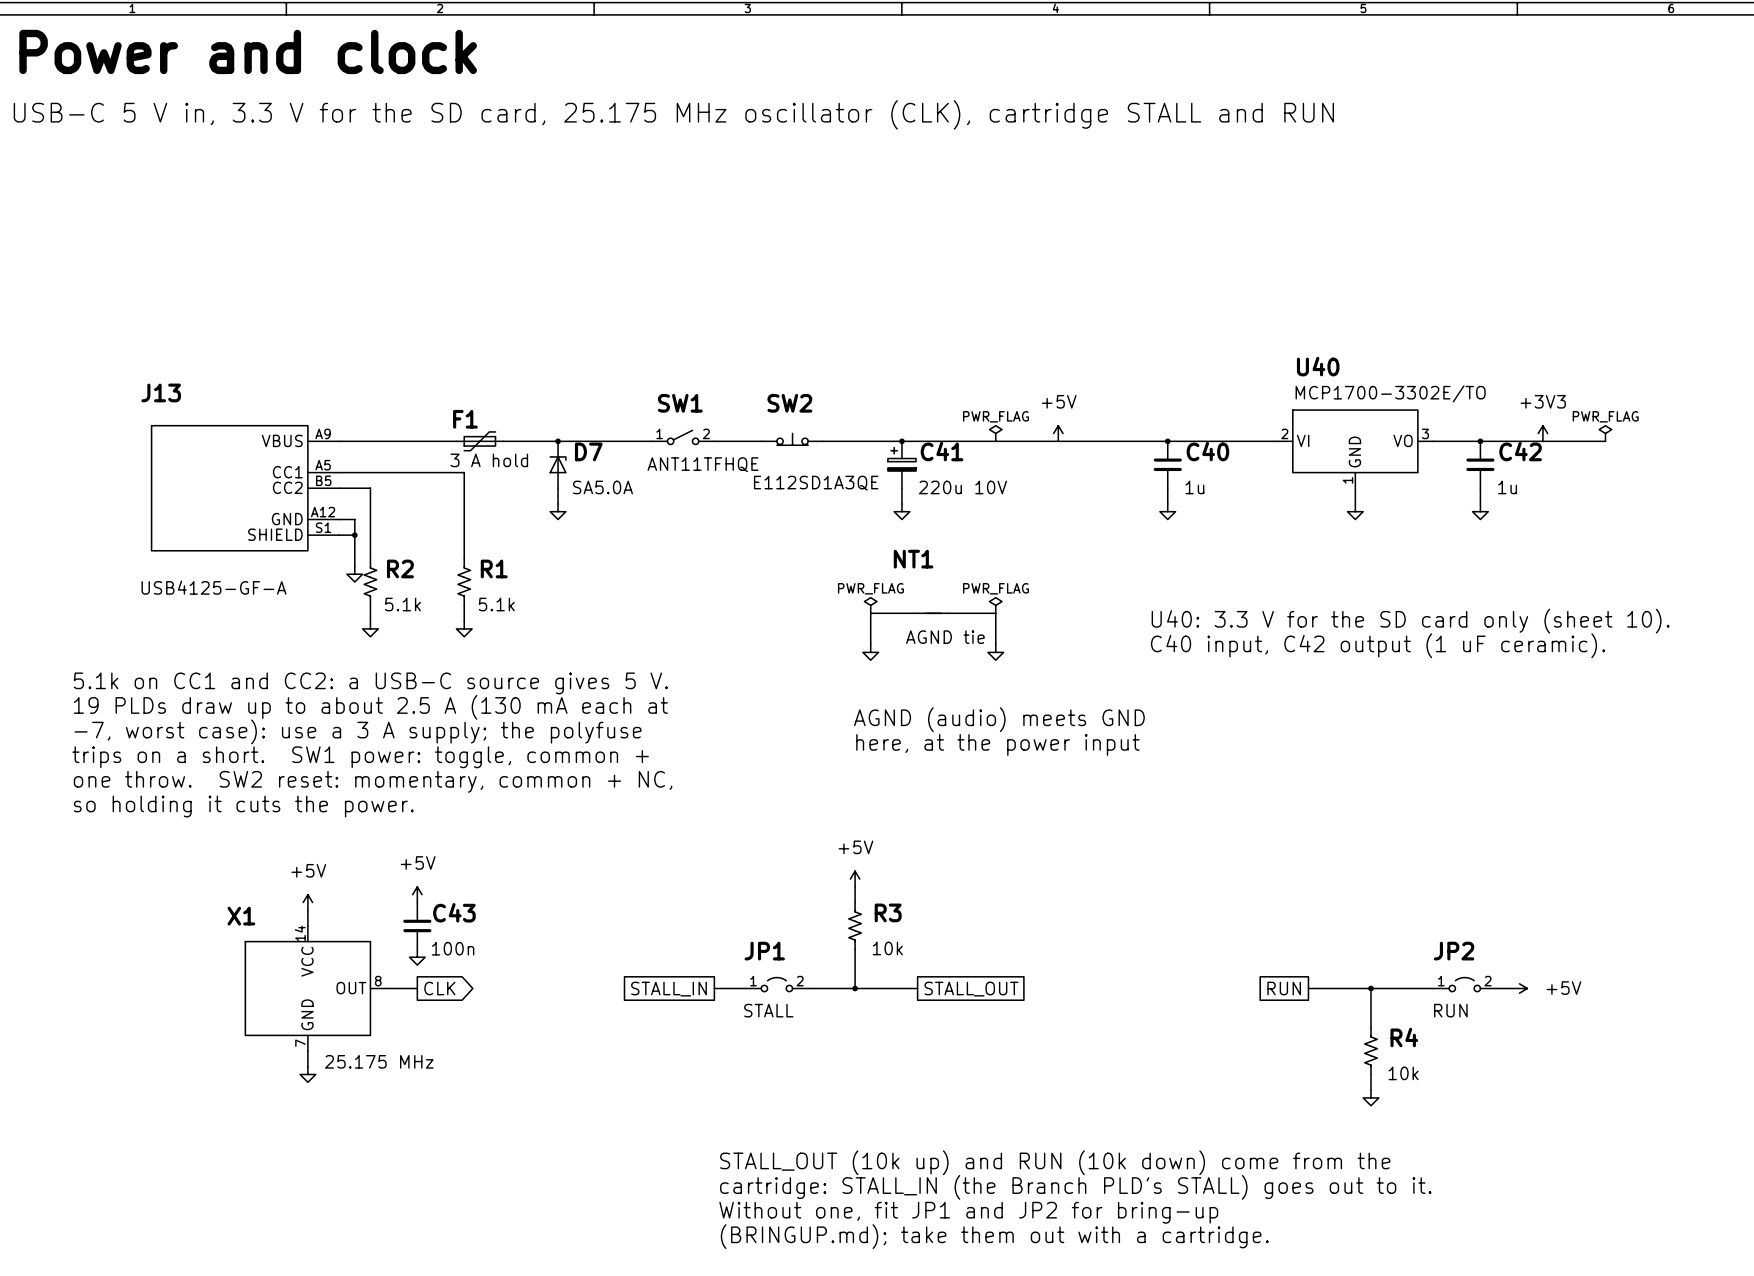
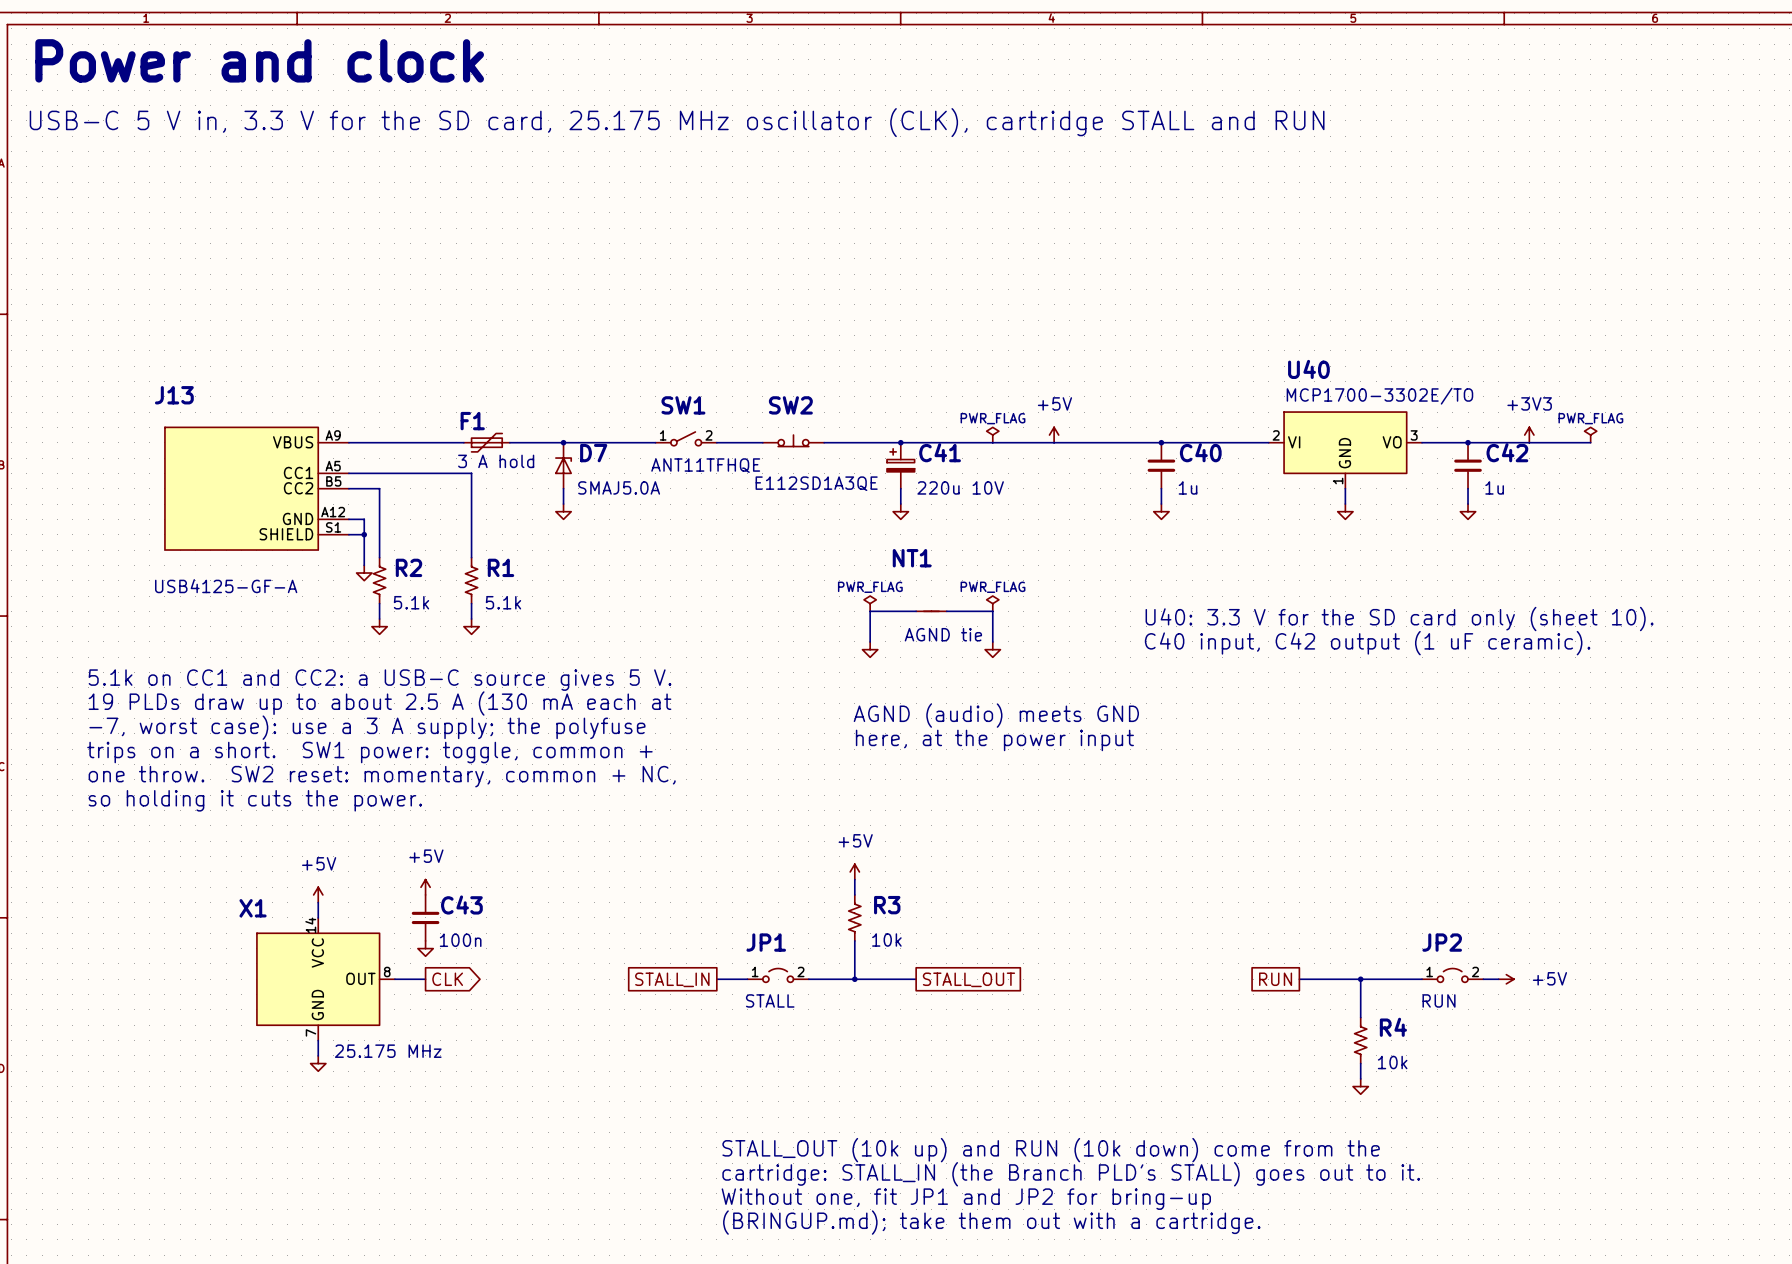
D7 value: SA5.0A (602, 487) -> SMAJ5.0A (619, 487)

